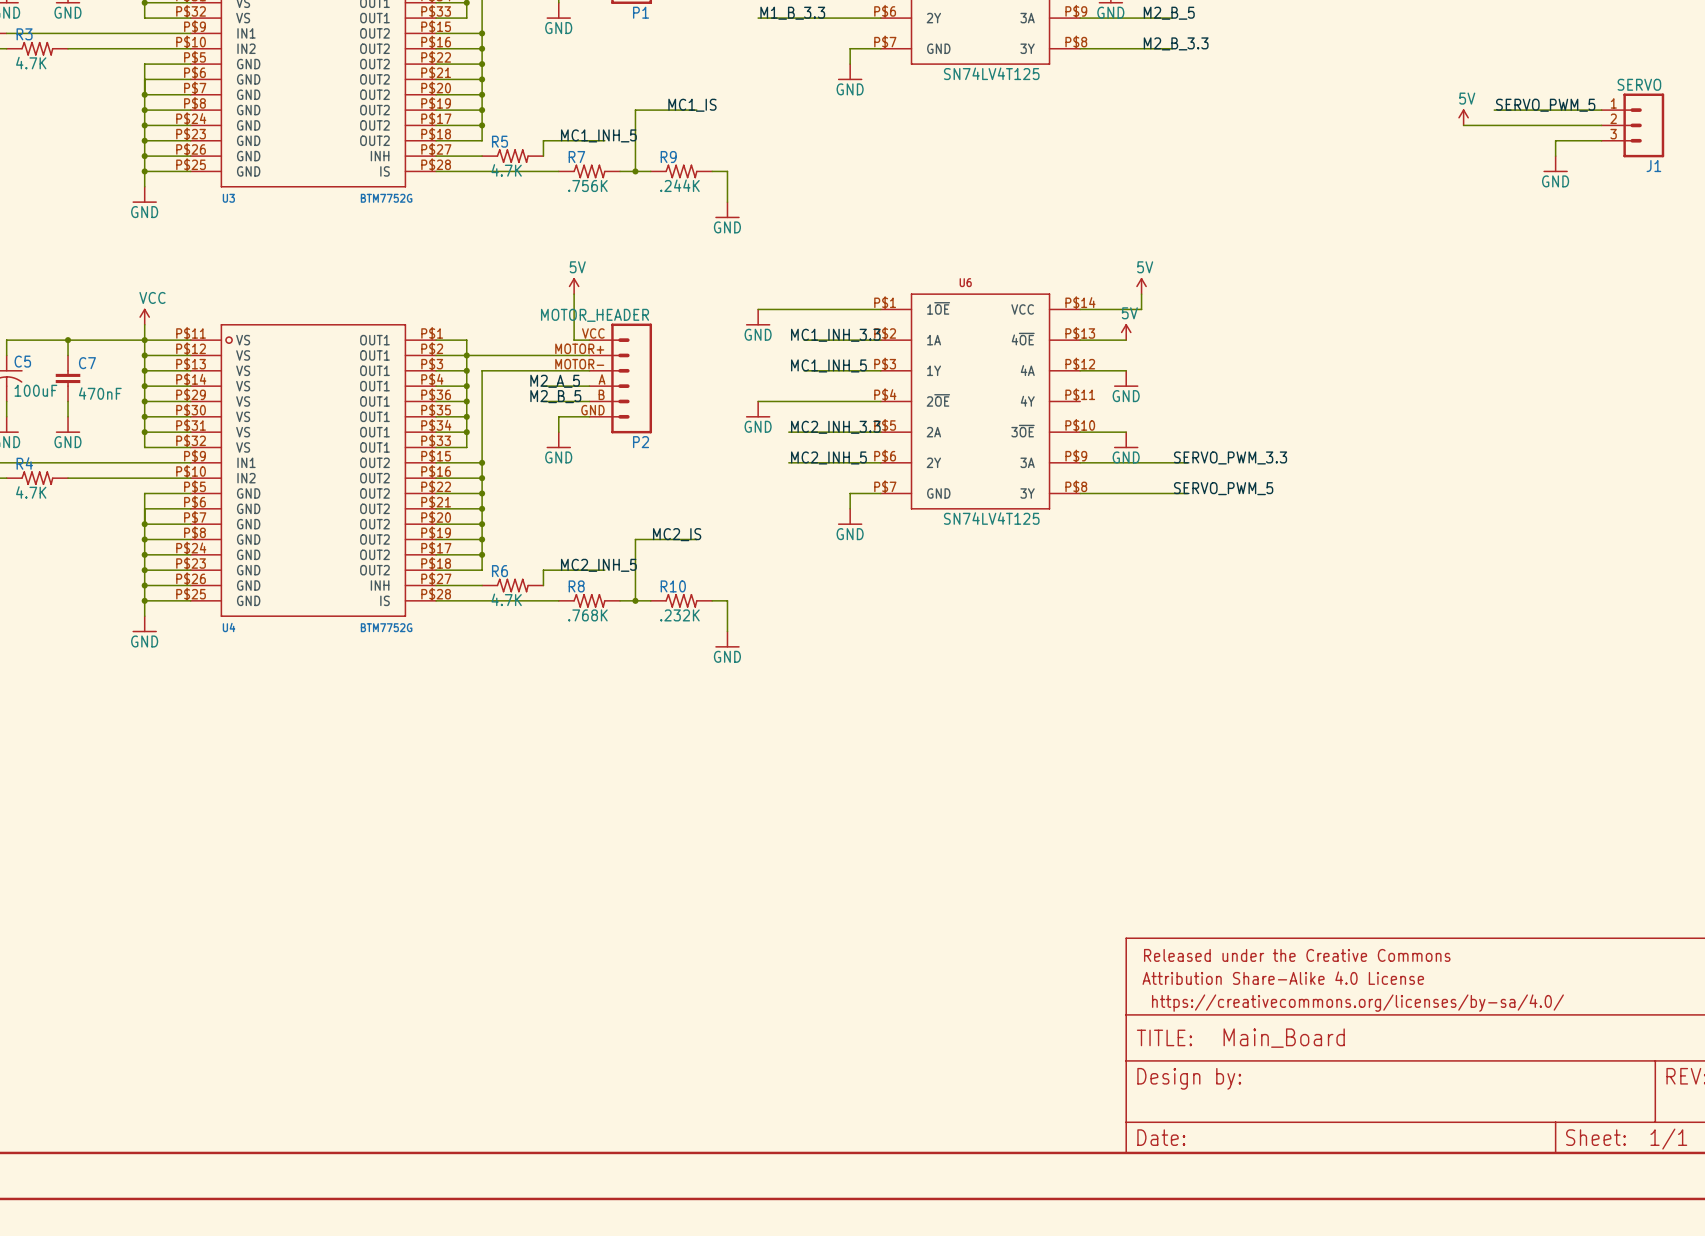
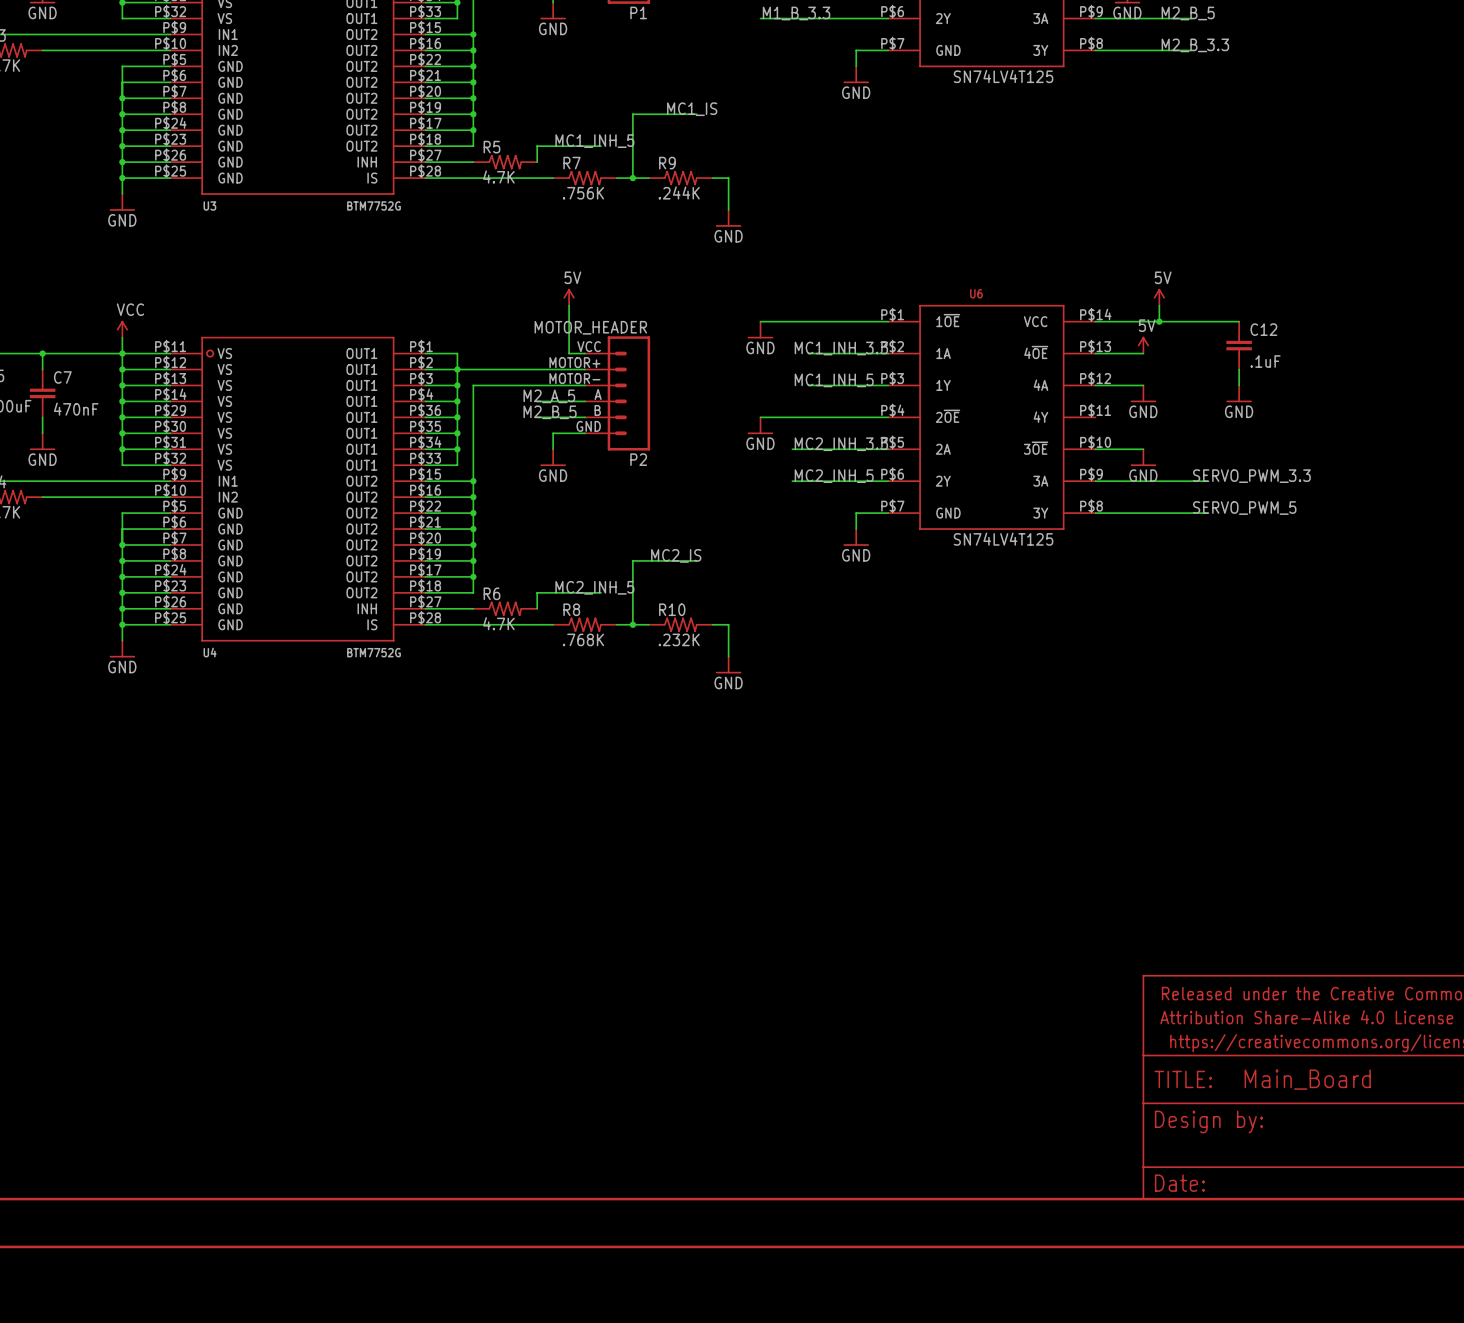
wire: none -> (1159, 321) (1239, 321)
junction: none -> (1159, 321)
C12: none -> .1uF (1239, 345)
wire: none -> (1239, 369) (1239, 385)
power symbol: none -> GND (1239, 393)

